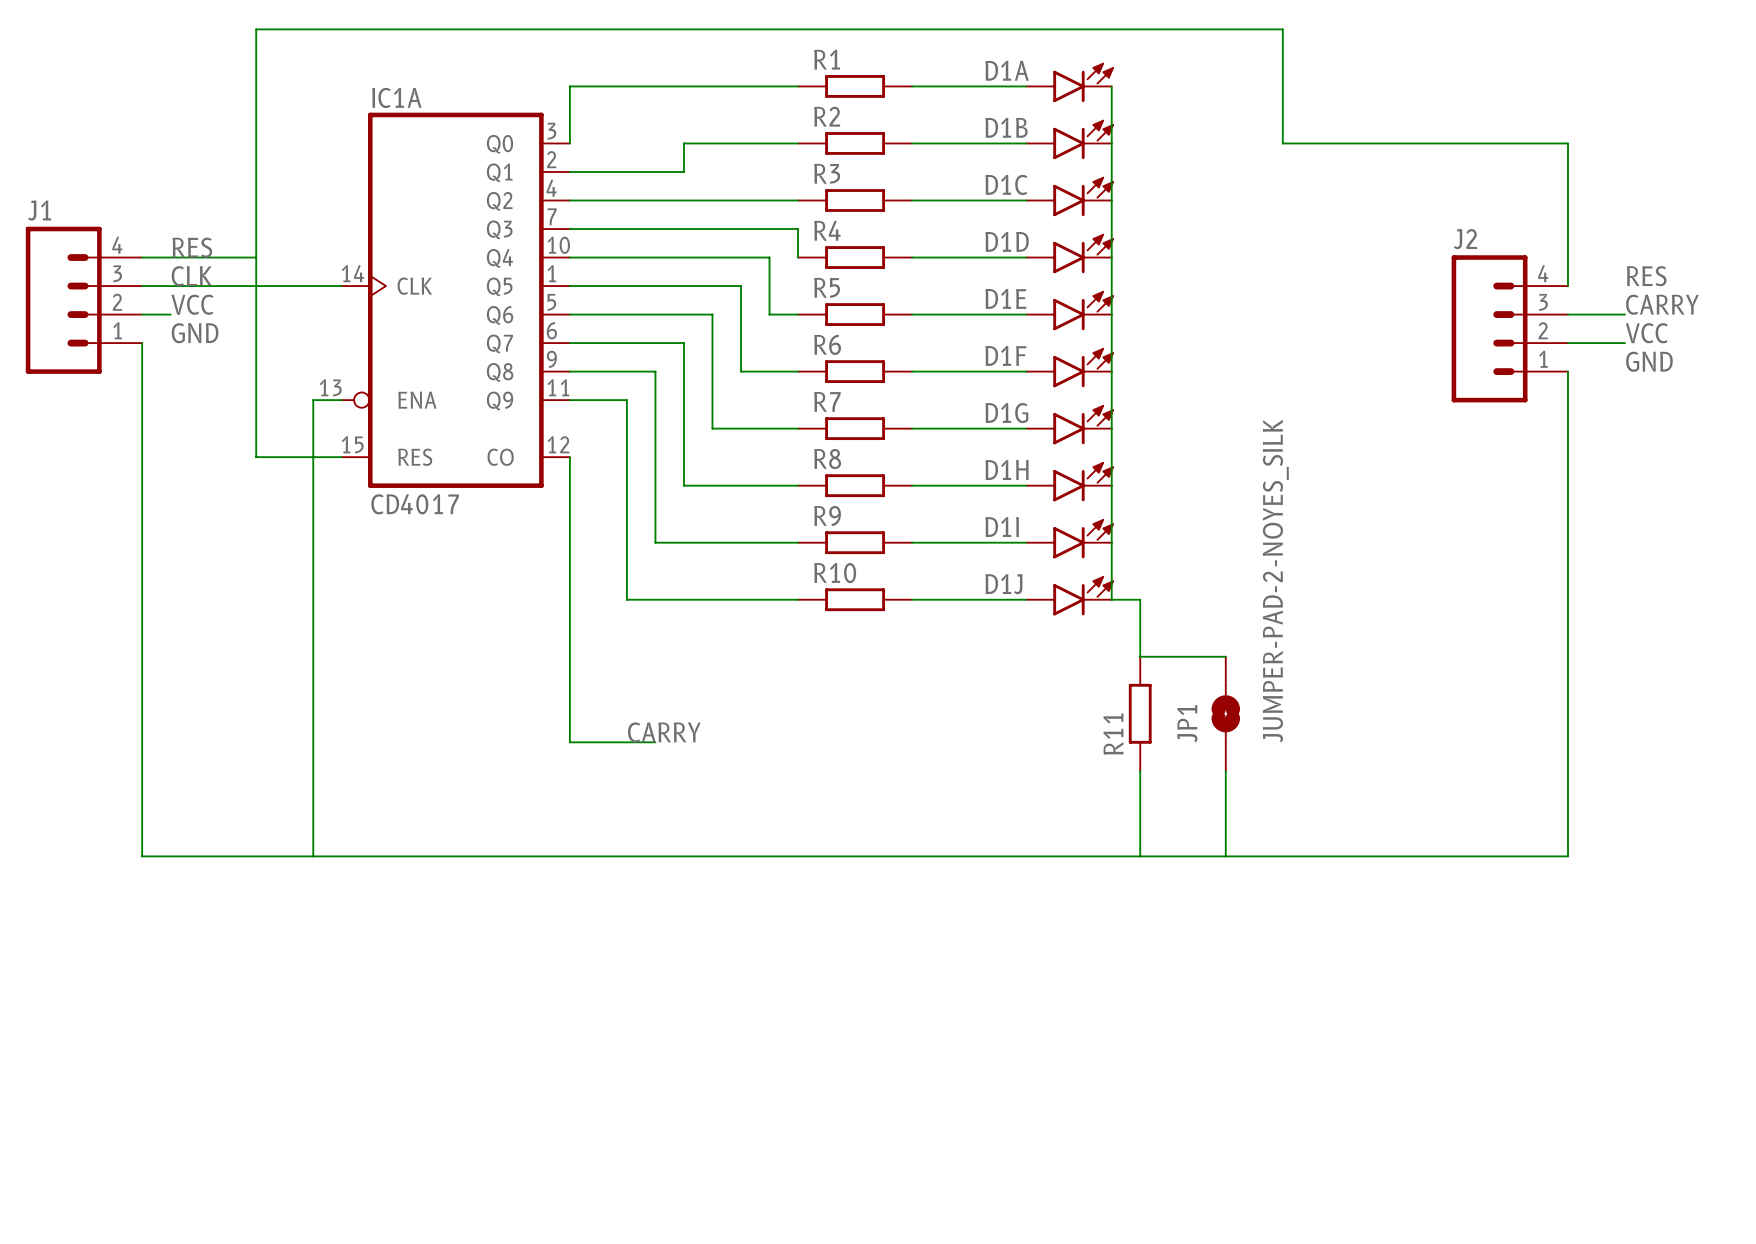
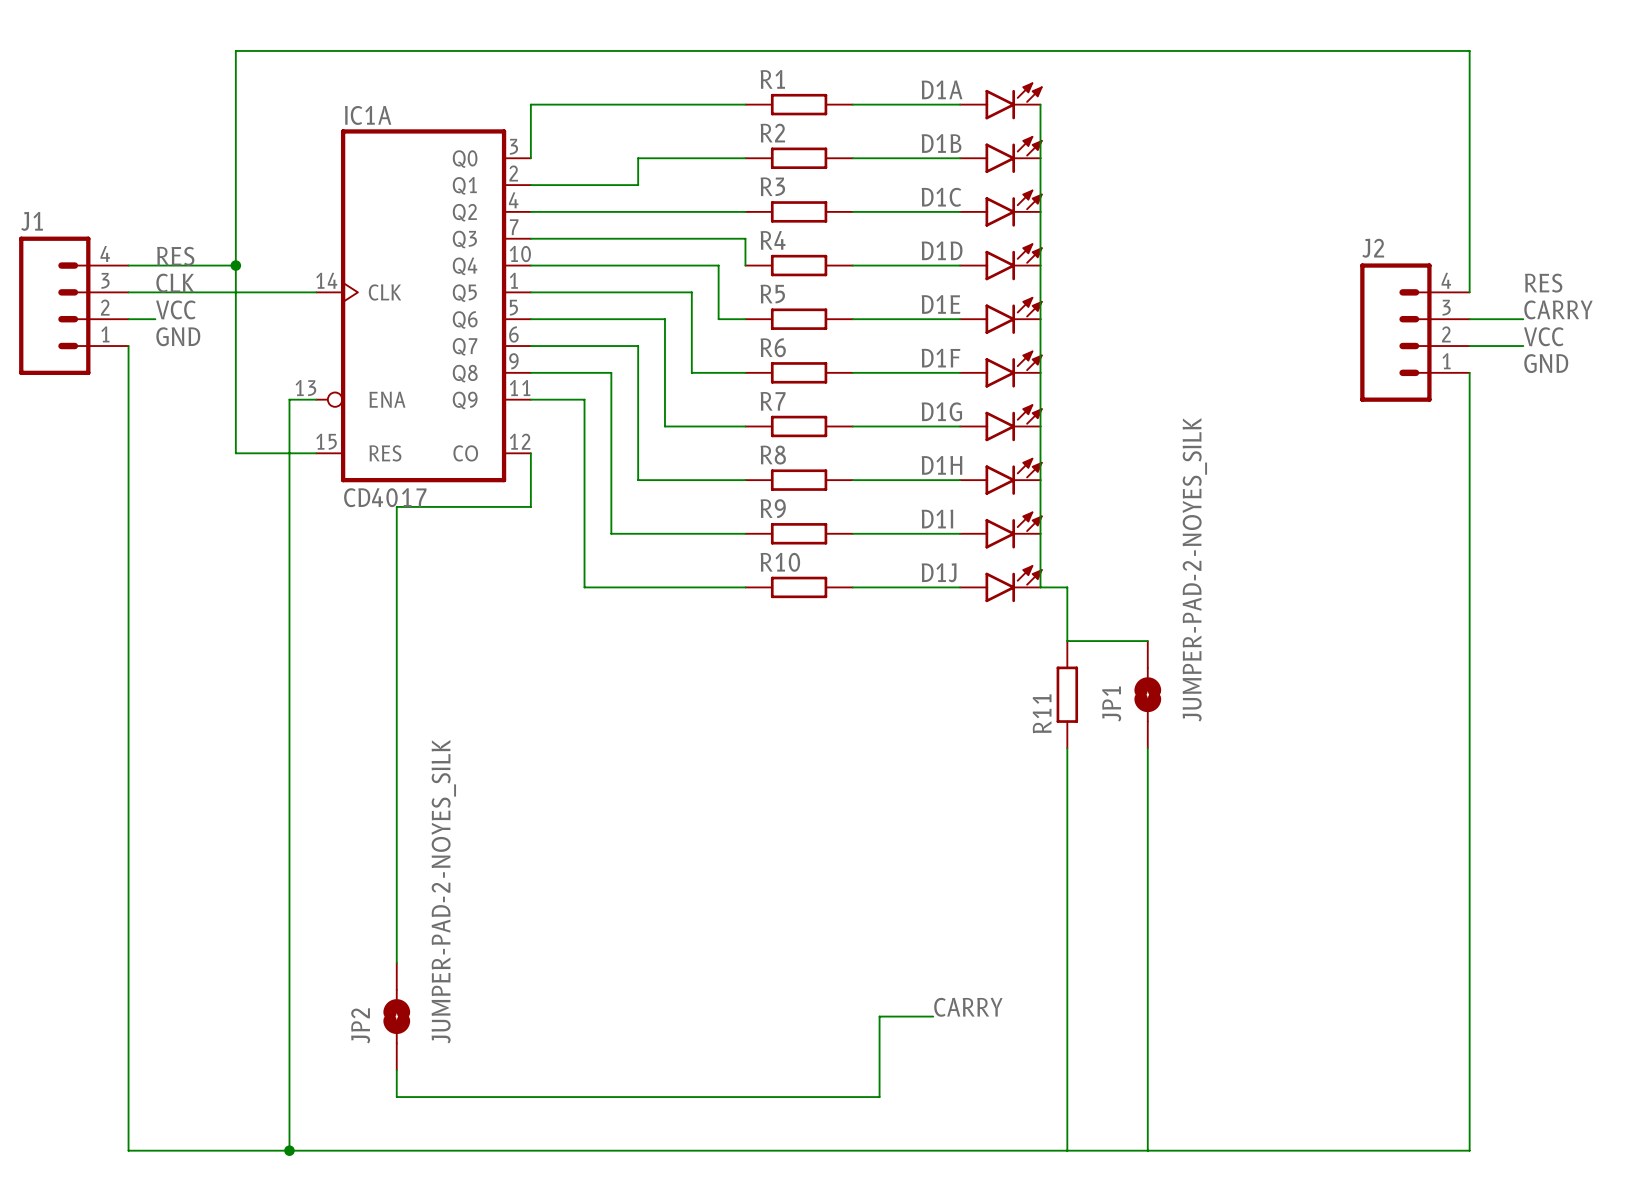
wire: (1282, 29) (1282, 143) (1567, 143) -> (1201, 50) (1469, 50) (1469, 158)
junction: none -> (235, 265)
wire: (569, 514) (569, 742) (655, 742) -> (530, 506) (396, 506) (396, 962)
label: CARRY (664, 732) -> none
wire: (142, 856) (1567, 856) -> (128, 828) (128, 1150) (1469, 1150) (1469, 828)
wire: none -> (289, 828) (289, 1150)
wire: none -> (1067, 828) (1067, 1150)
wire: none -> (1147, 828) (1147, 1150)
label: none -> CARRY (968, 1007)
JP2: none -> JUMPER-PAD-2-NOYES_SILK (396, 1016)
wire: none -> (933, 1016) (879, 1016) (879, 1097) (396, 1097) (396, 1070)
junction: none -> (289, 1150)

